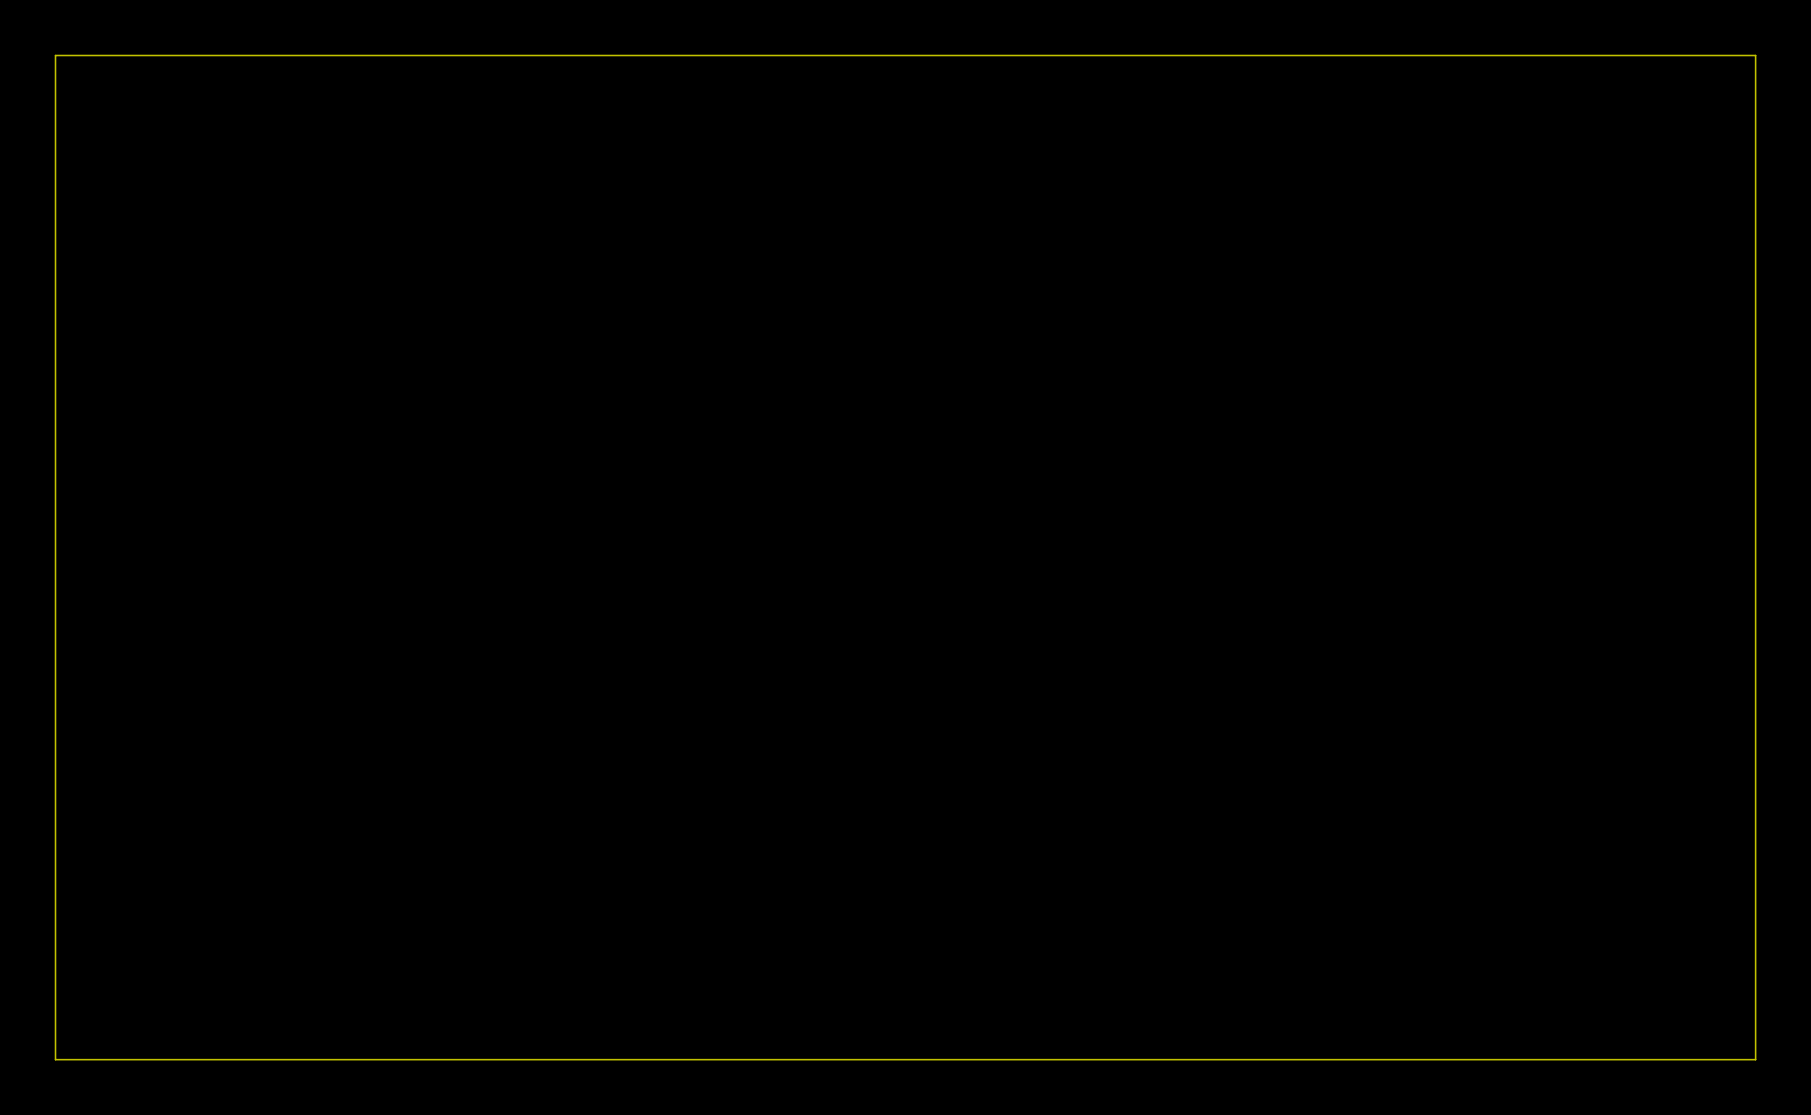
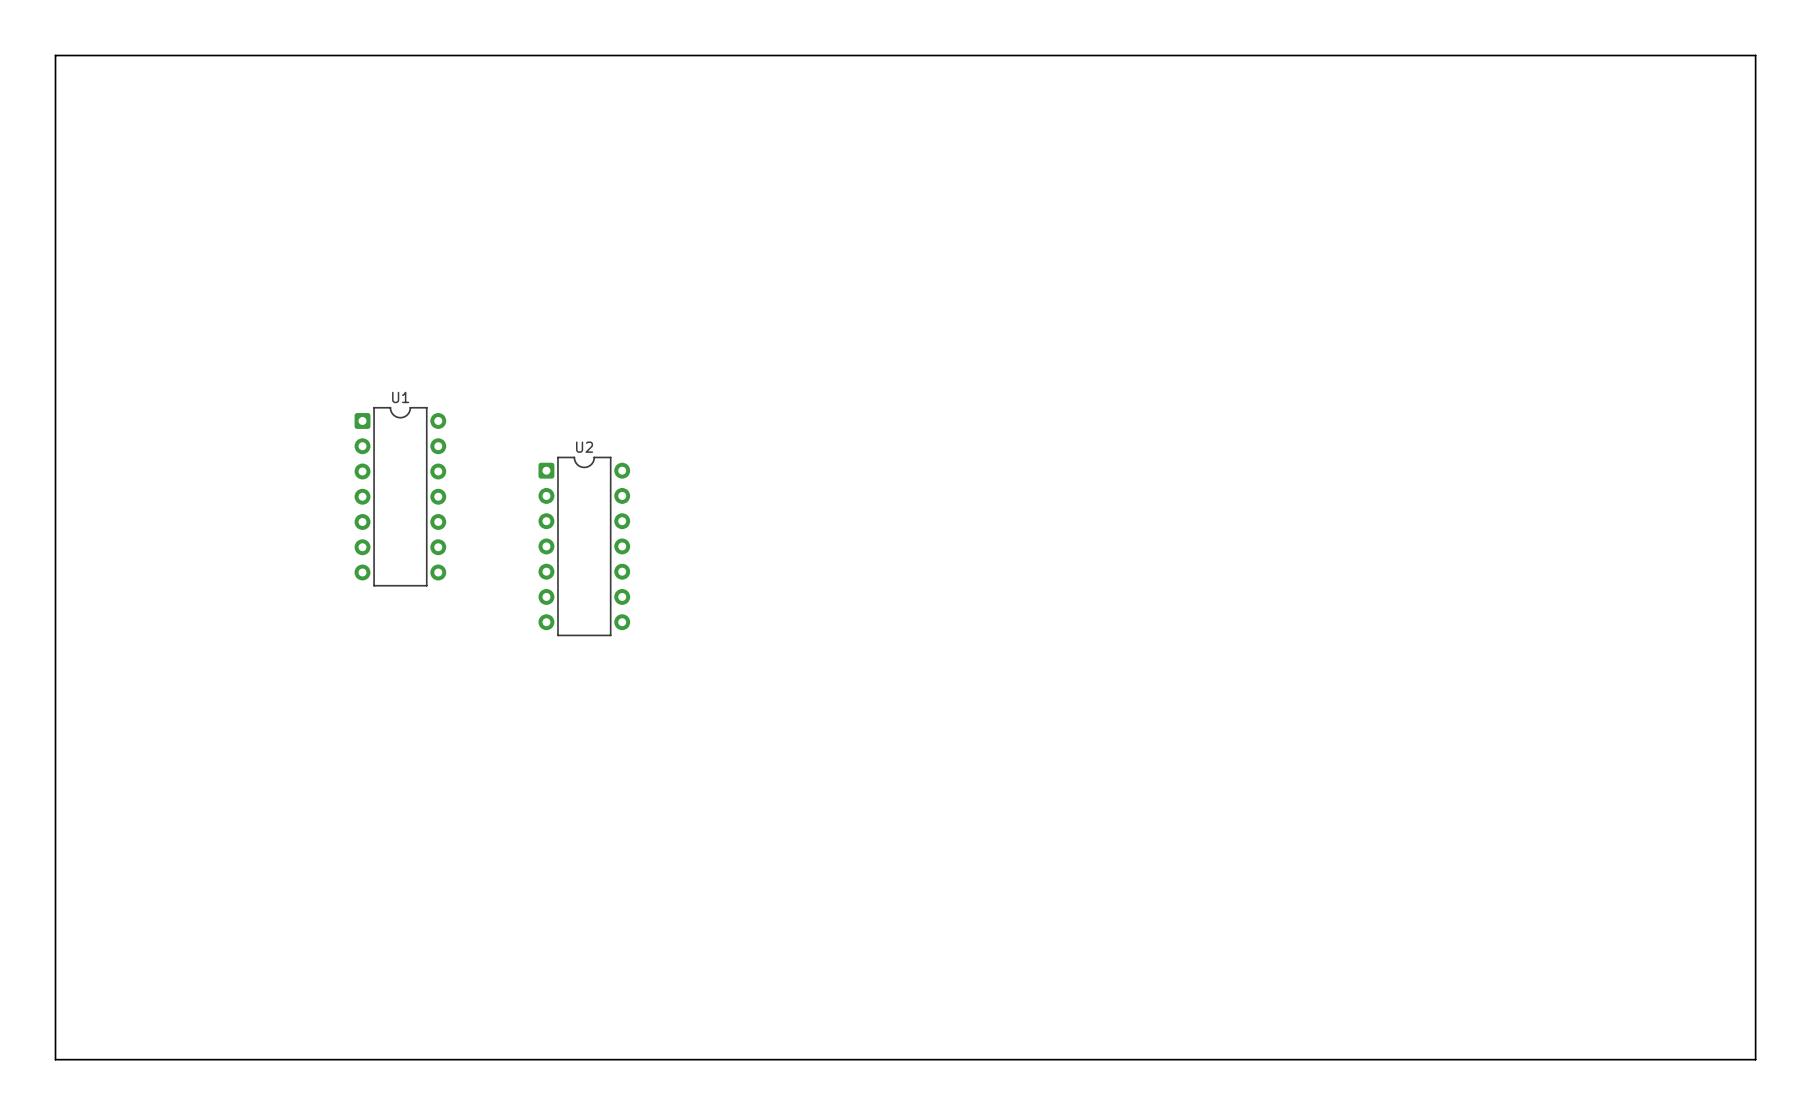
U1: none -> (400, 496)
U2: none -> (584, 546)

